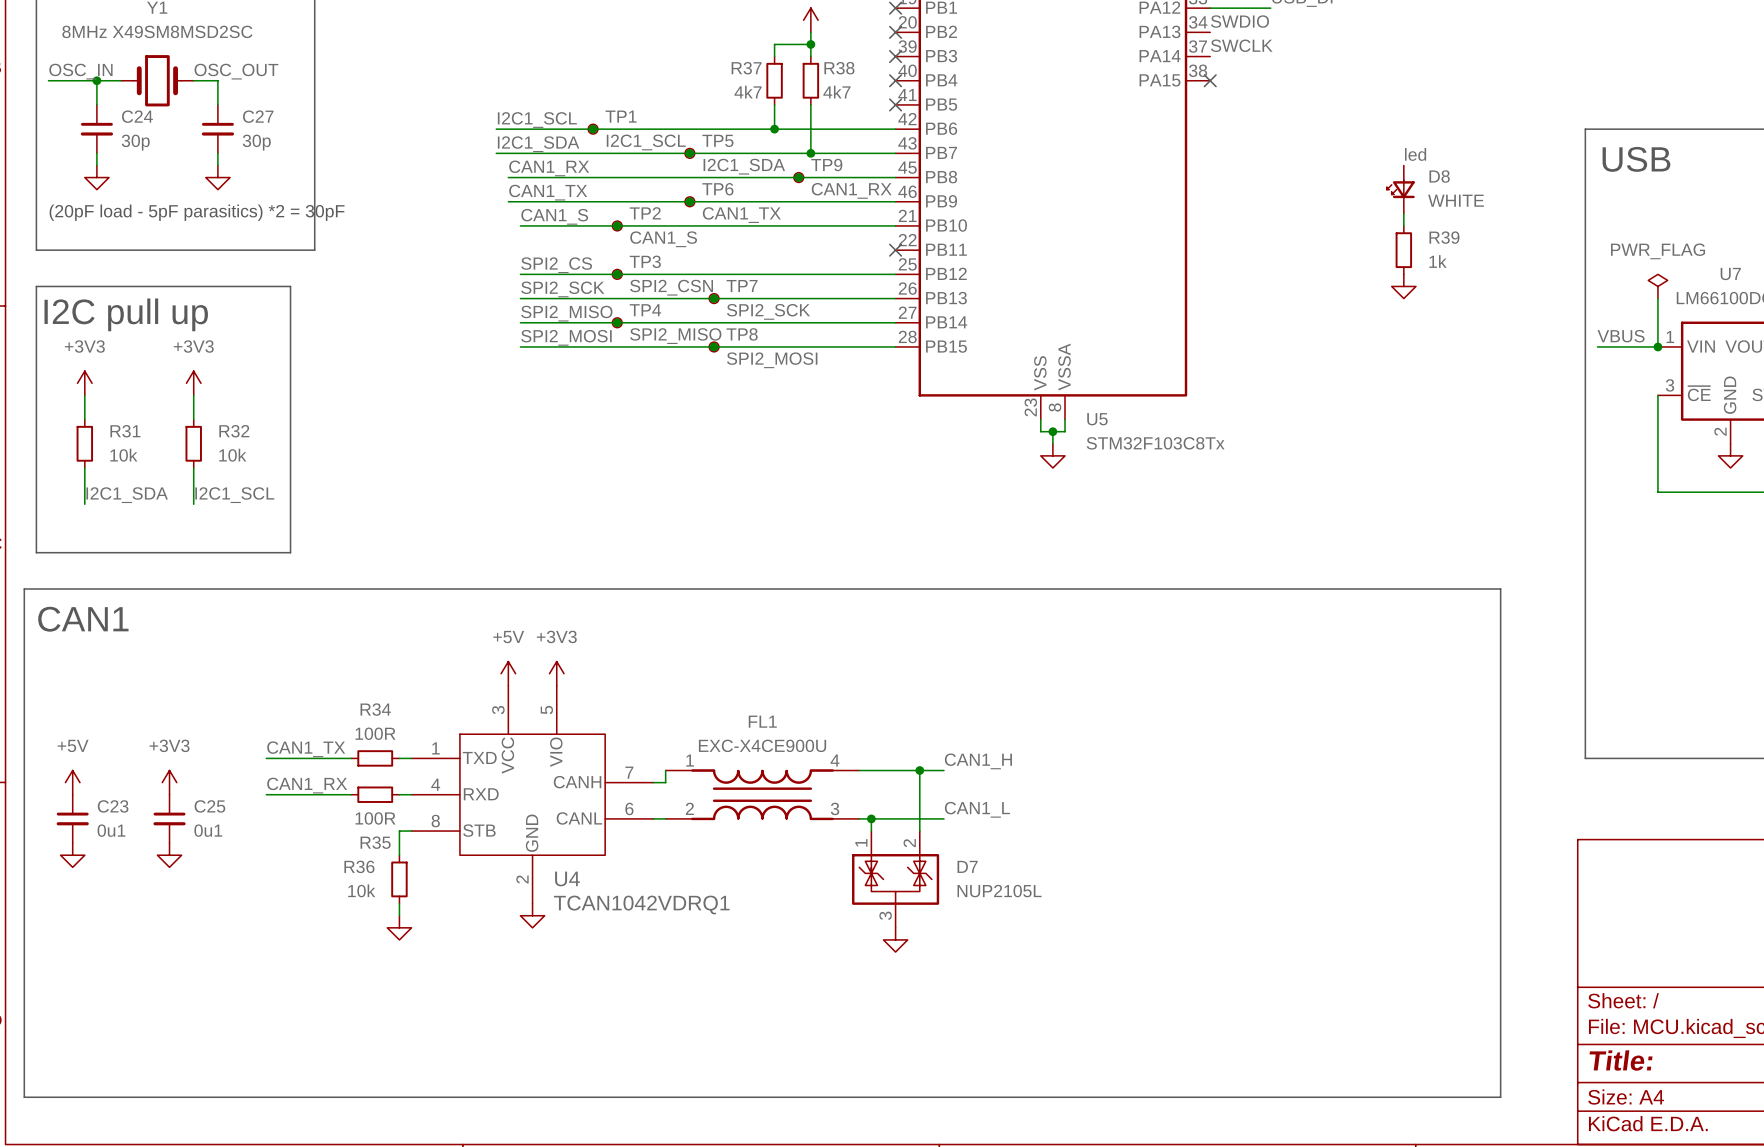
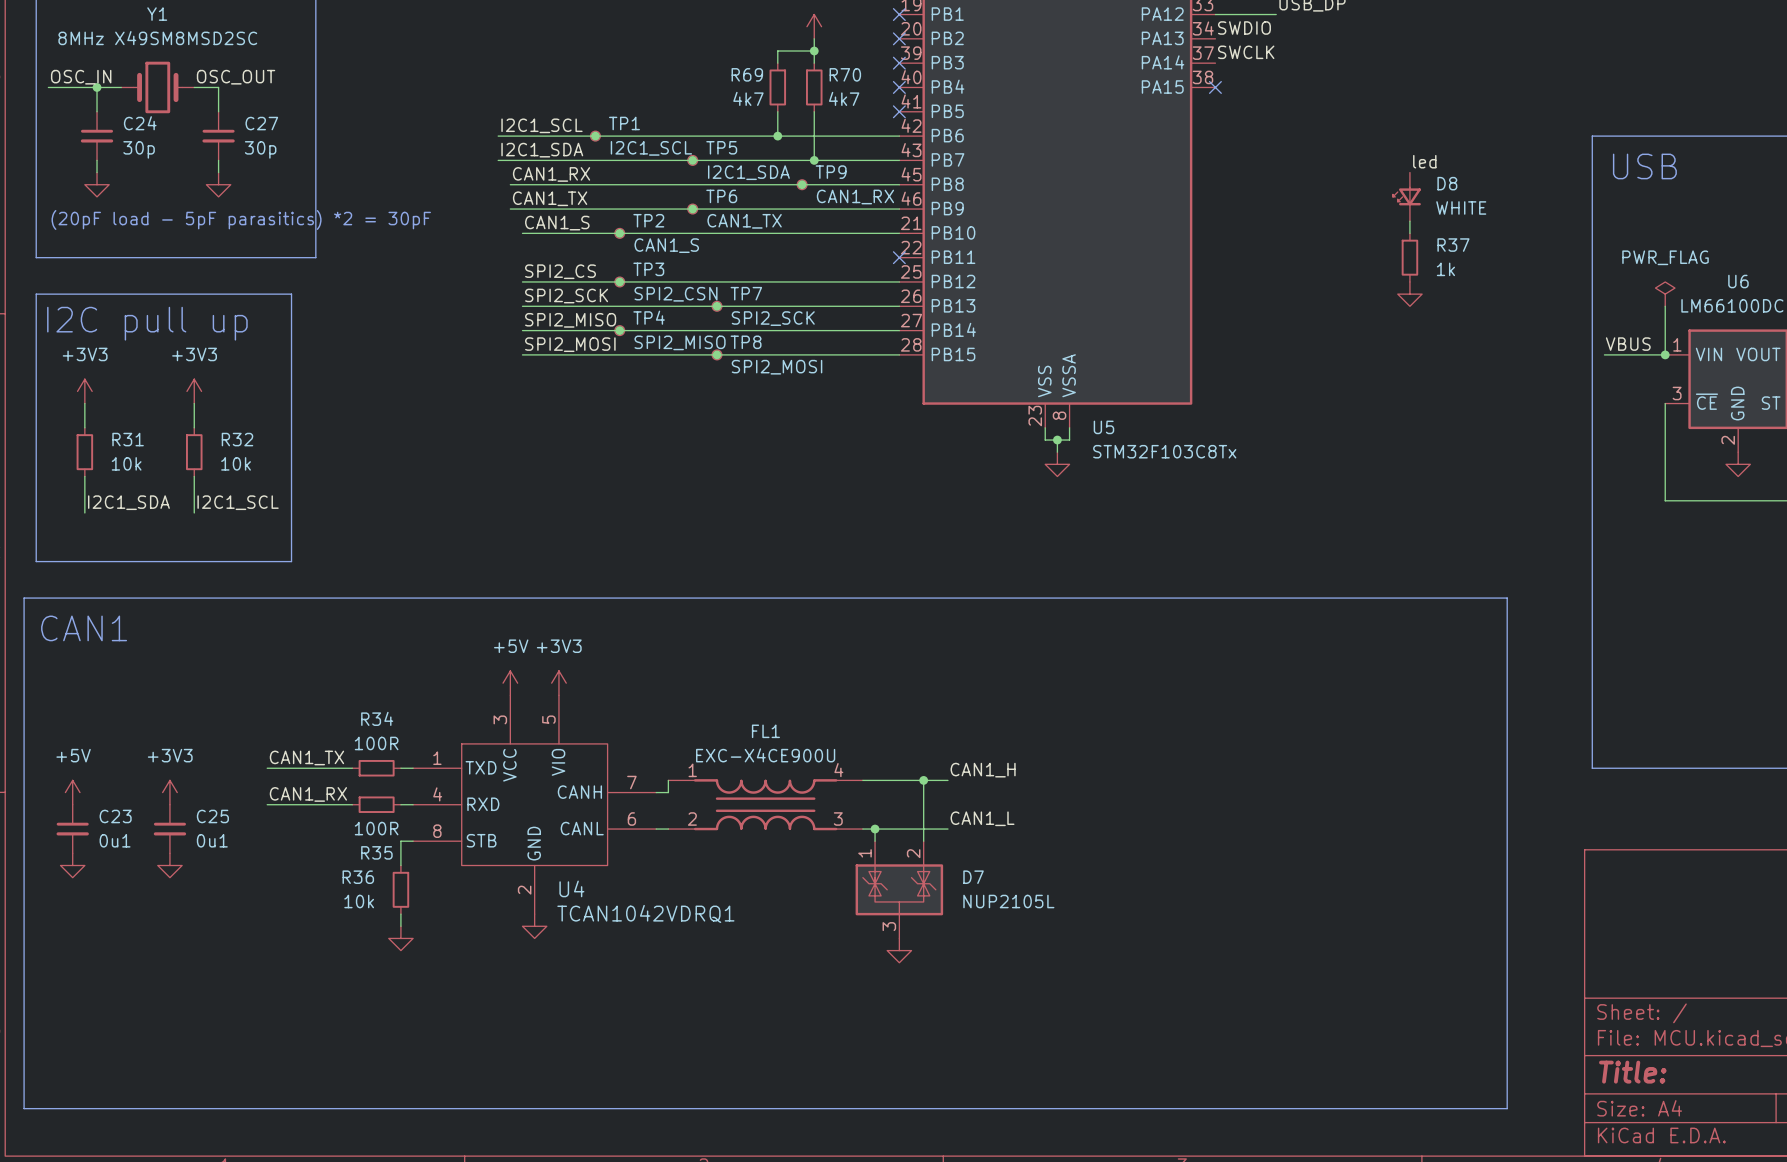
R37 name: R37 (746, 68) -> R69 (747, 74)
R38 name: R38 (839, 68) -> R70 (845, 74)
R39 name: R39 (1444, 237) -> R37 (1453, 245)
U7 name: U7 (1730, 274) -> U6 (1738, 281)

